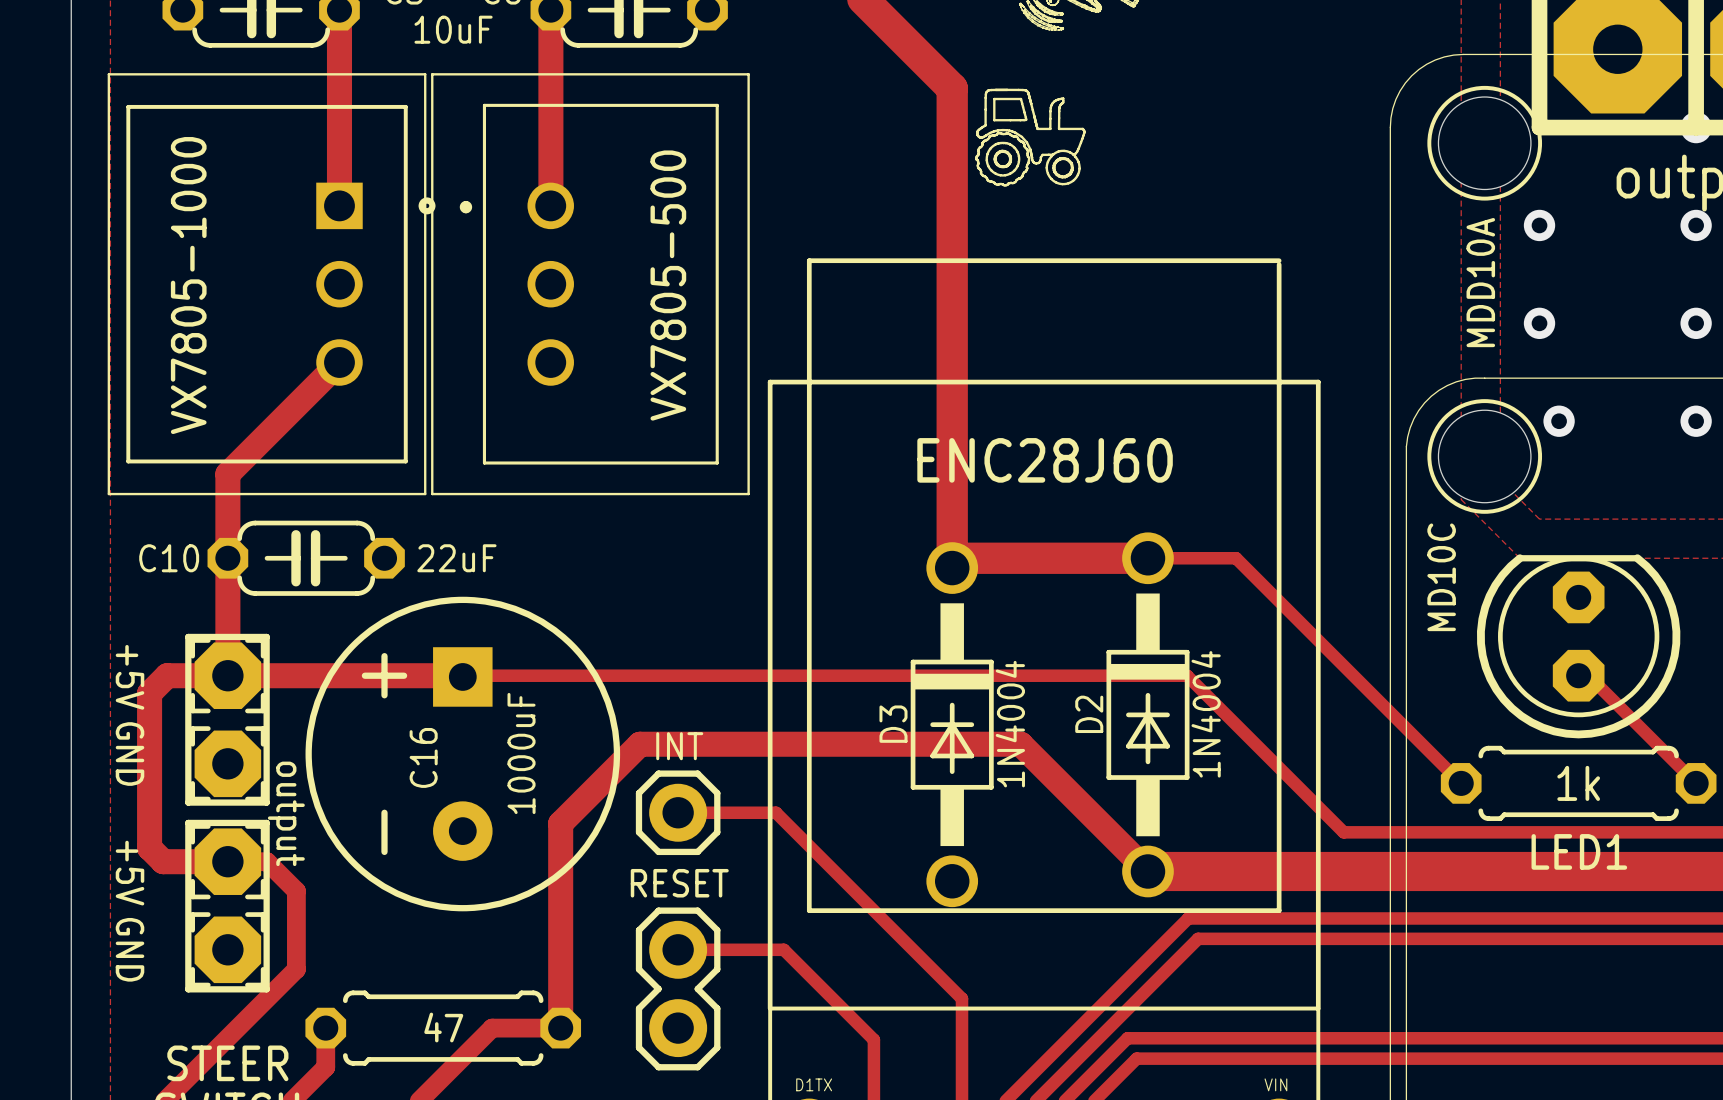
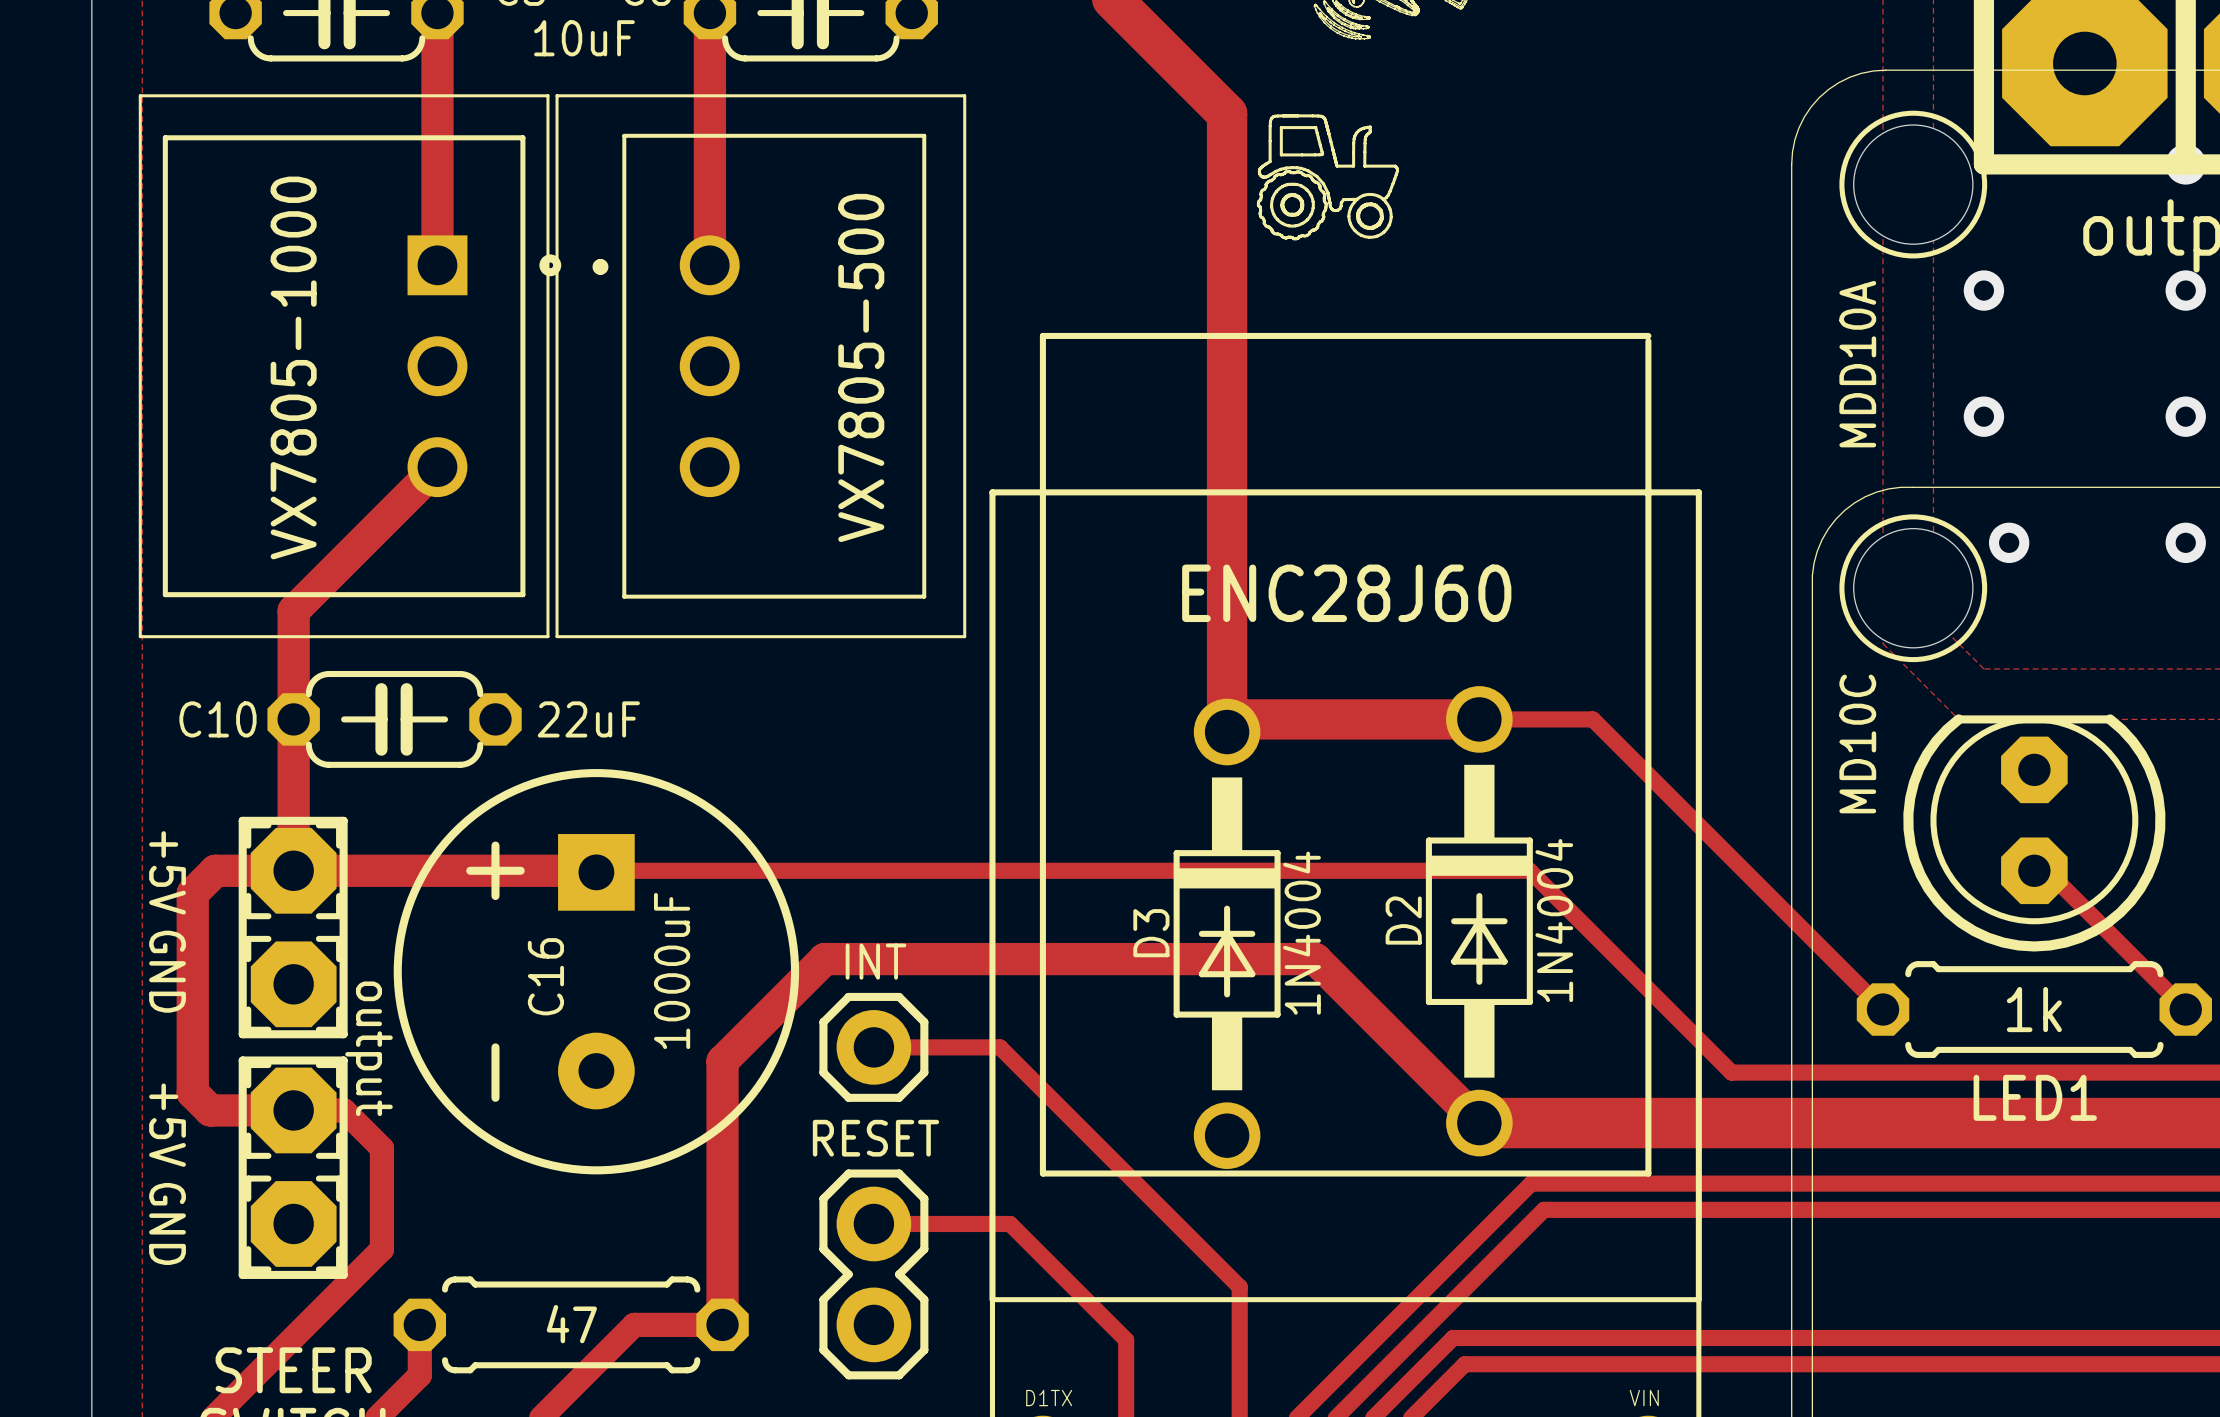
text position: MDD10A (1480, 282) -> MDD10A (1857, 364)
text position: VX7805-1000 (188, 285) -> VX7805-1000 (293, 367)

